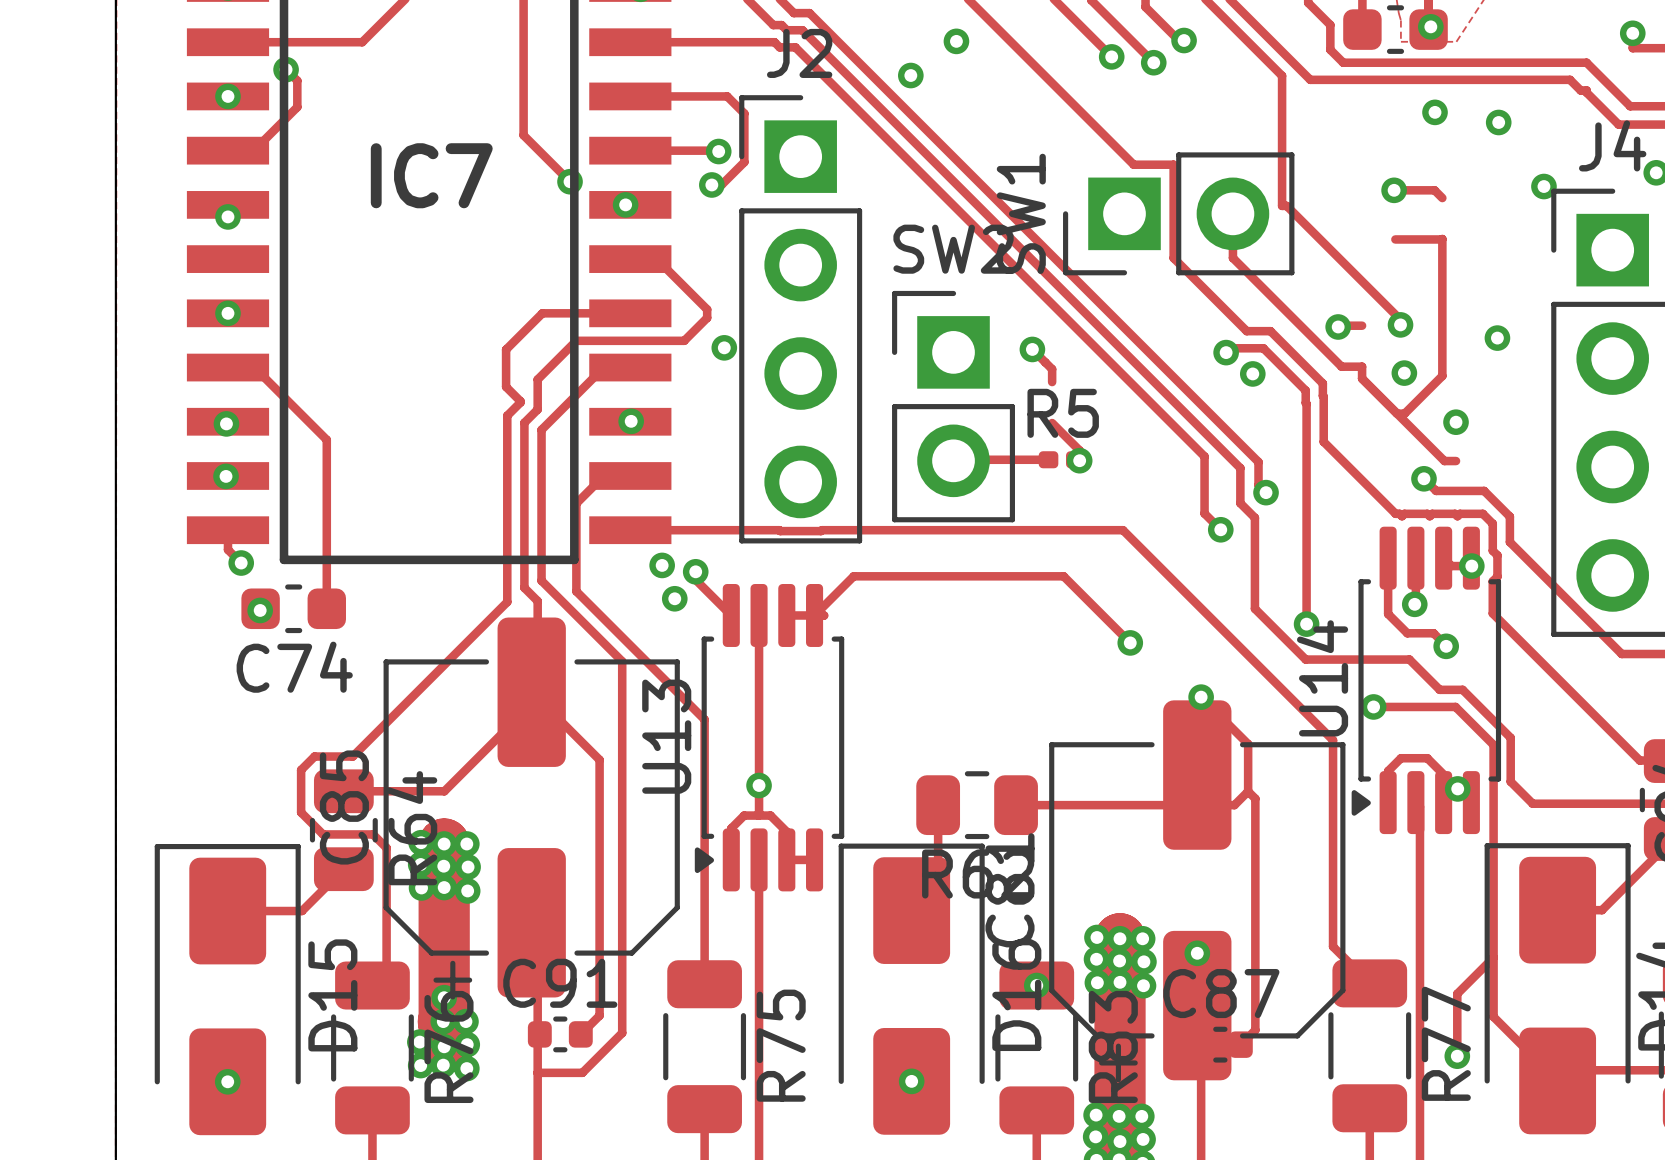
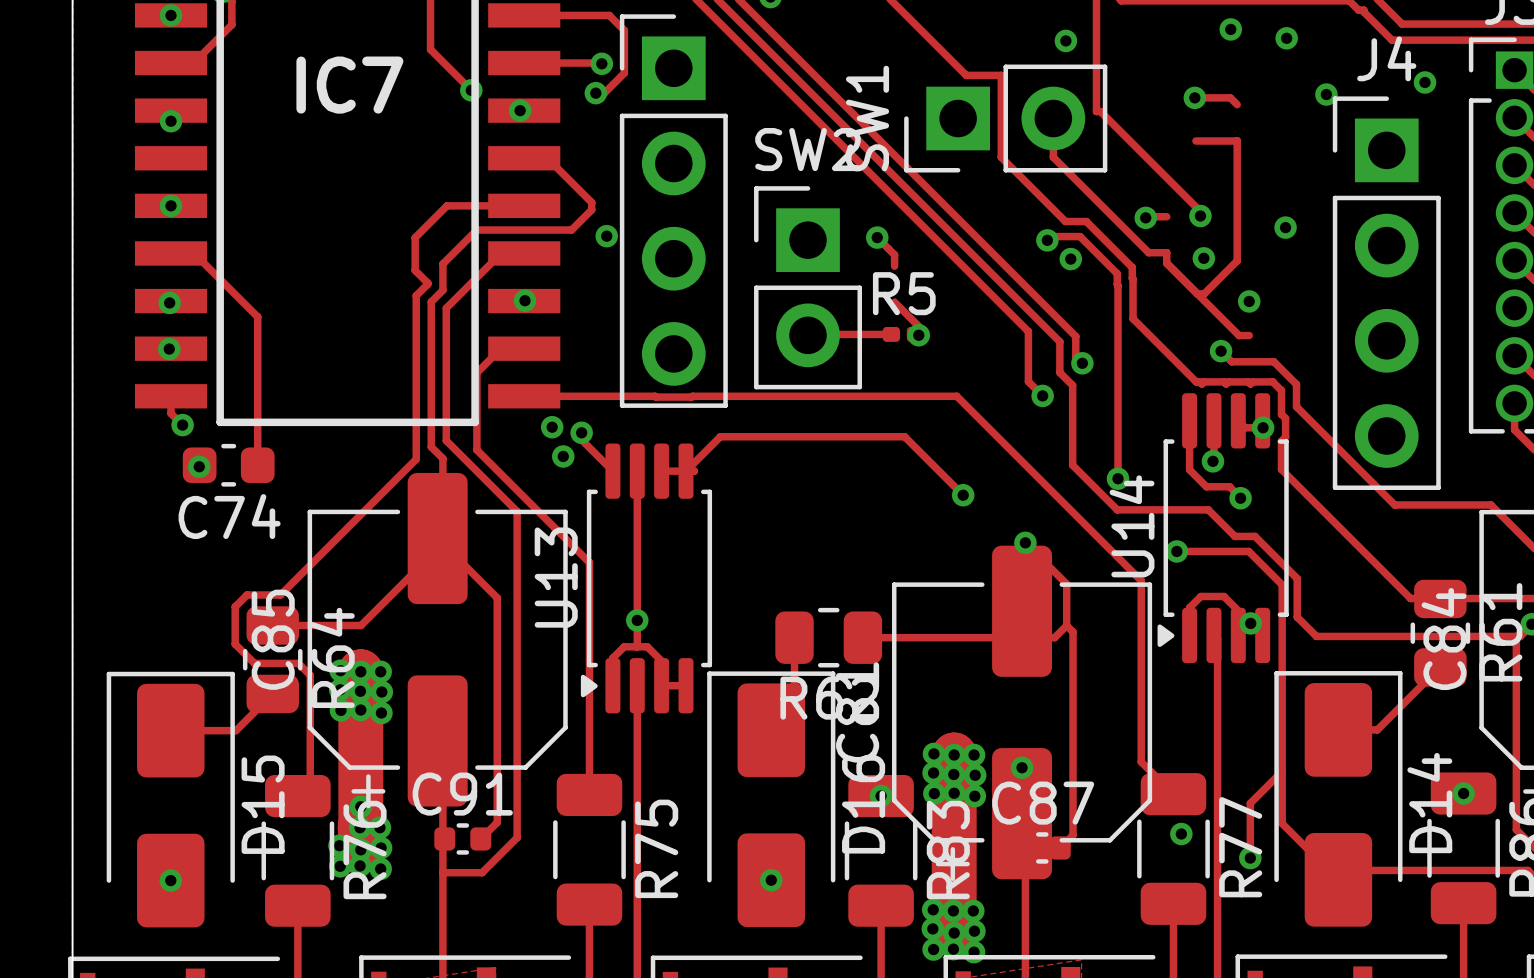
via: none -> (1065, 40)
via: none -> (1181, 834)

